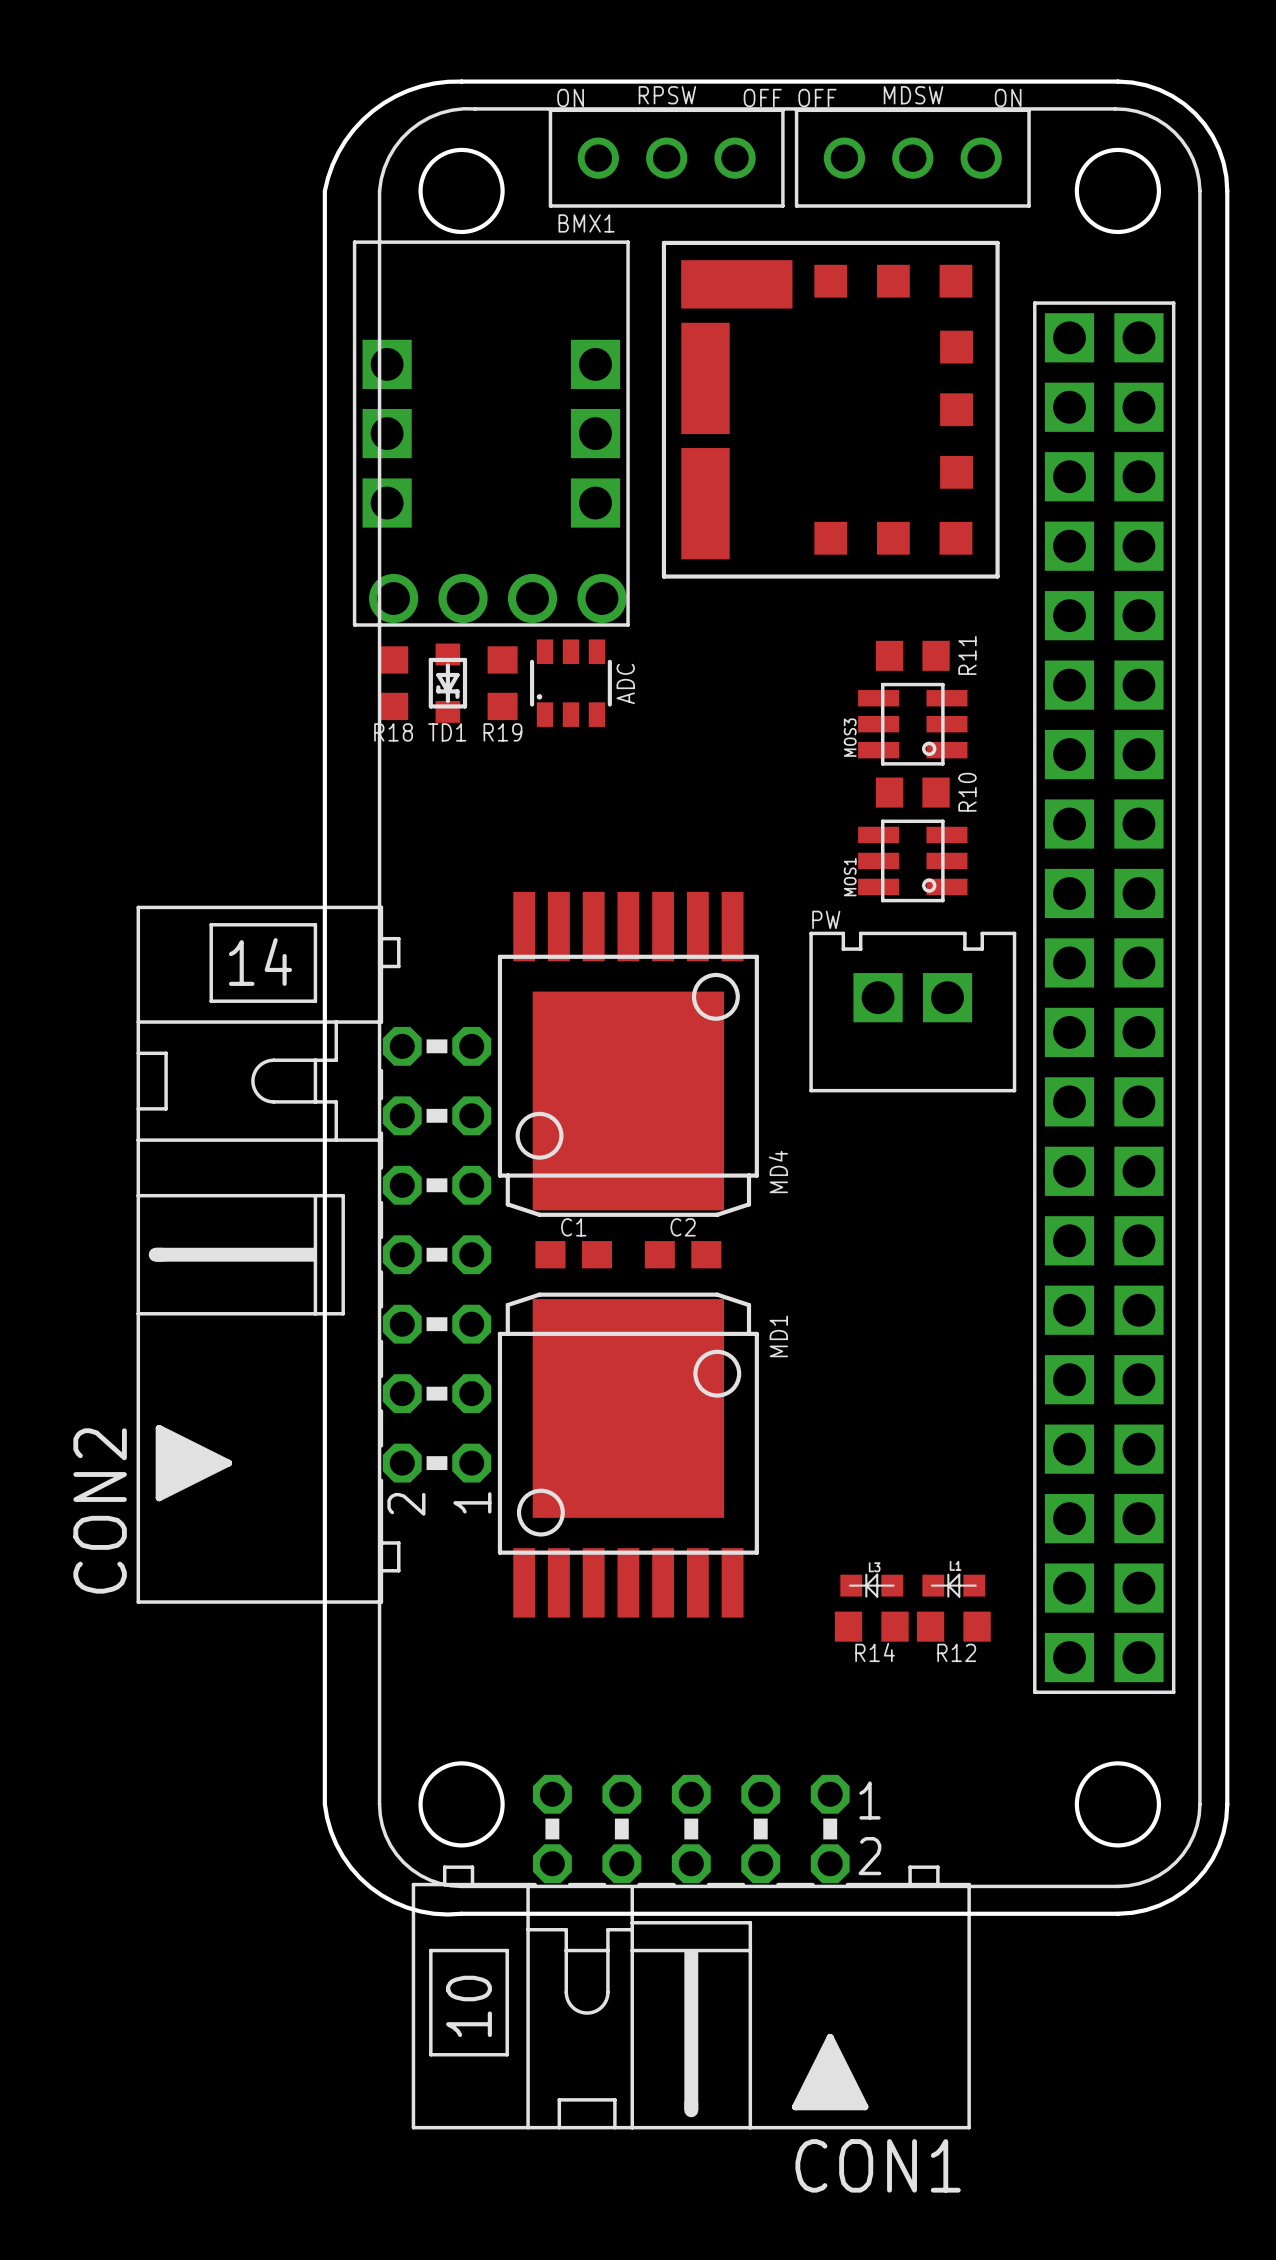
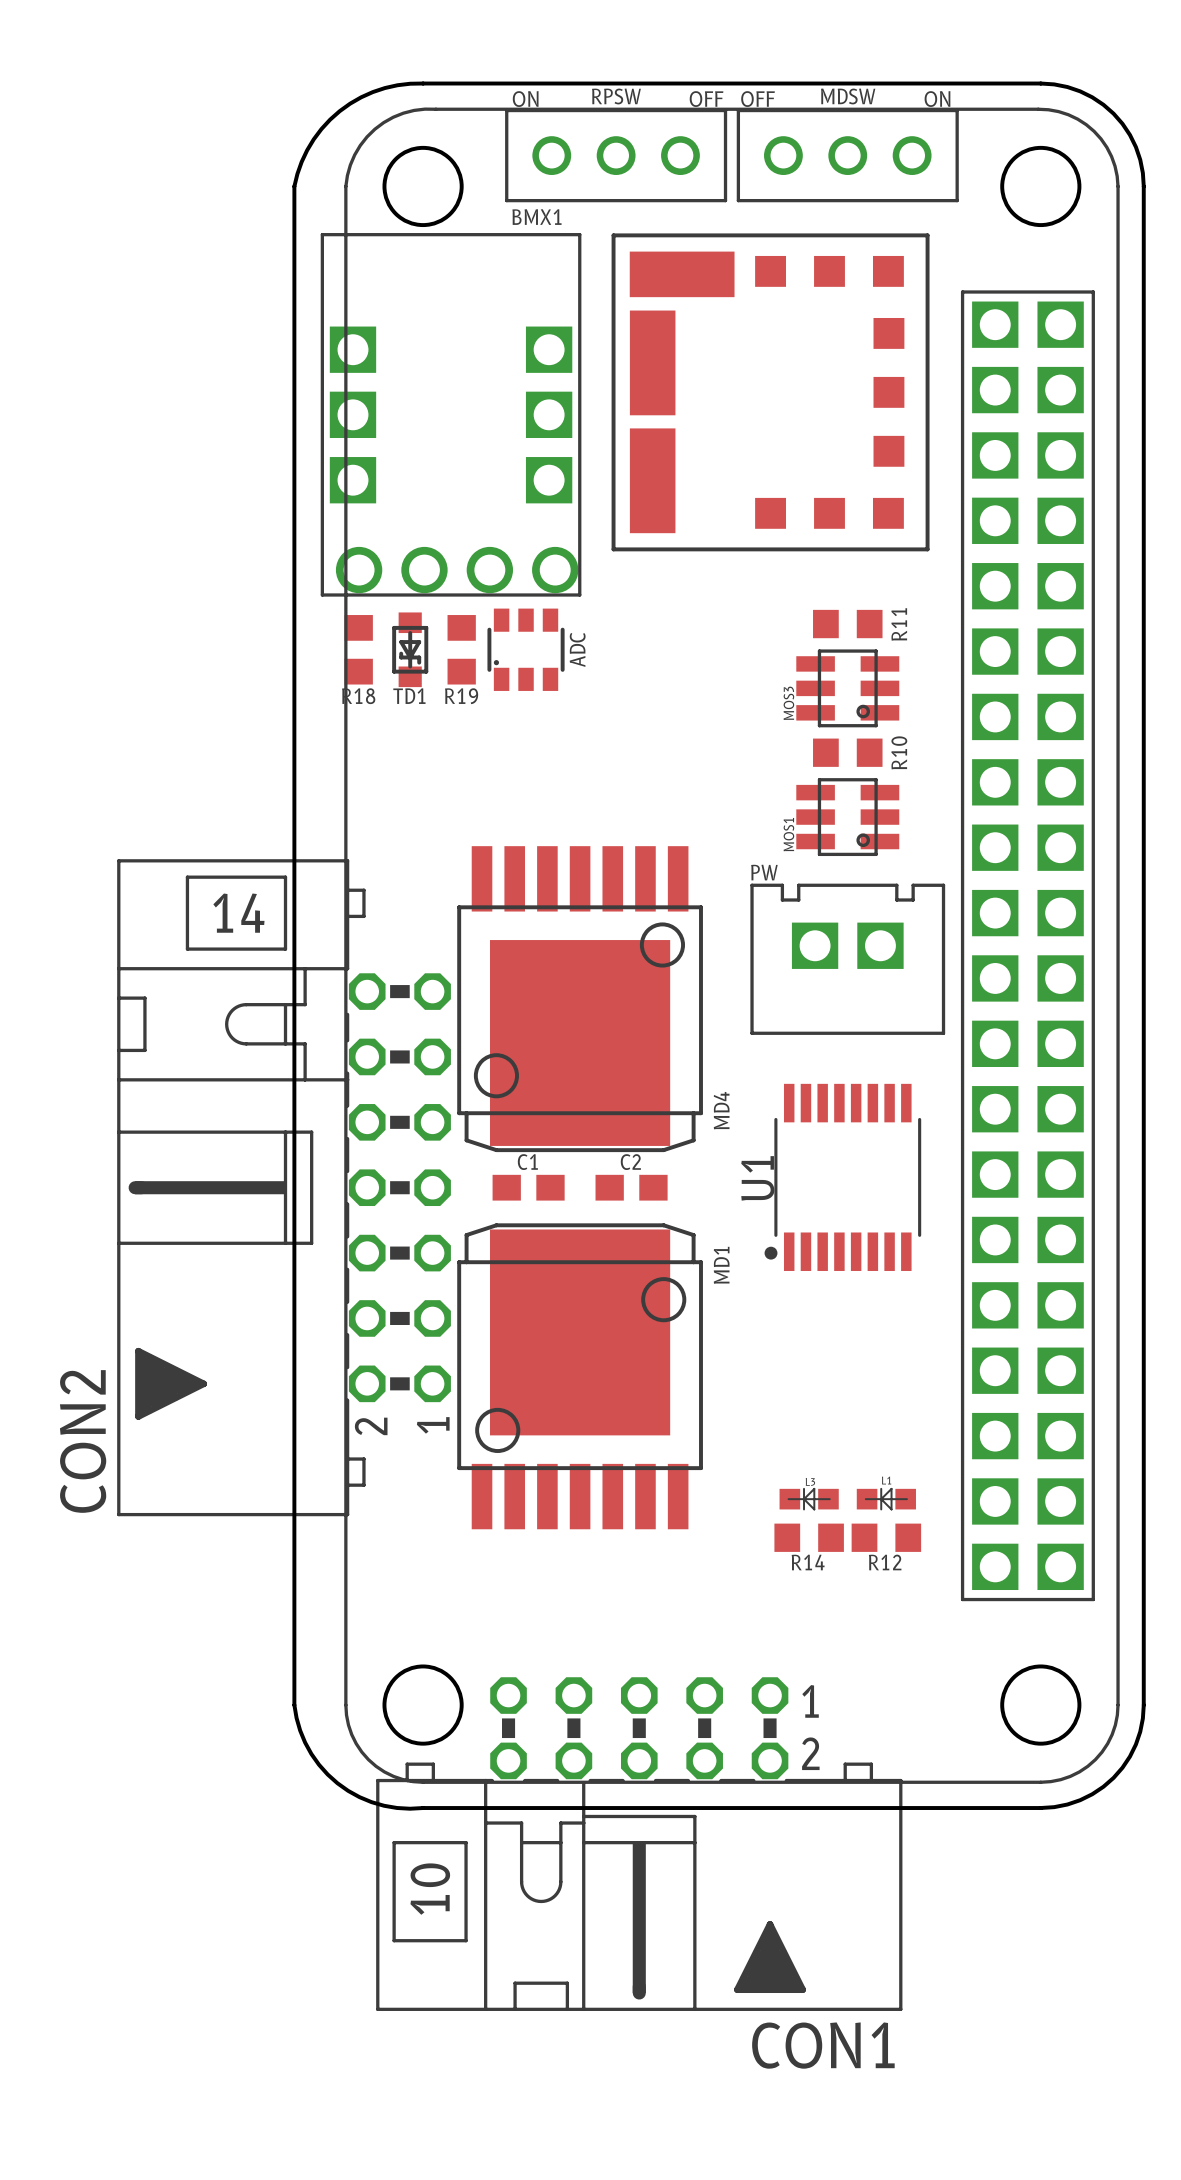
U1: none -> (842, 1177)

